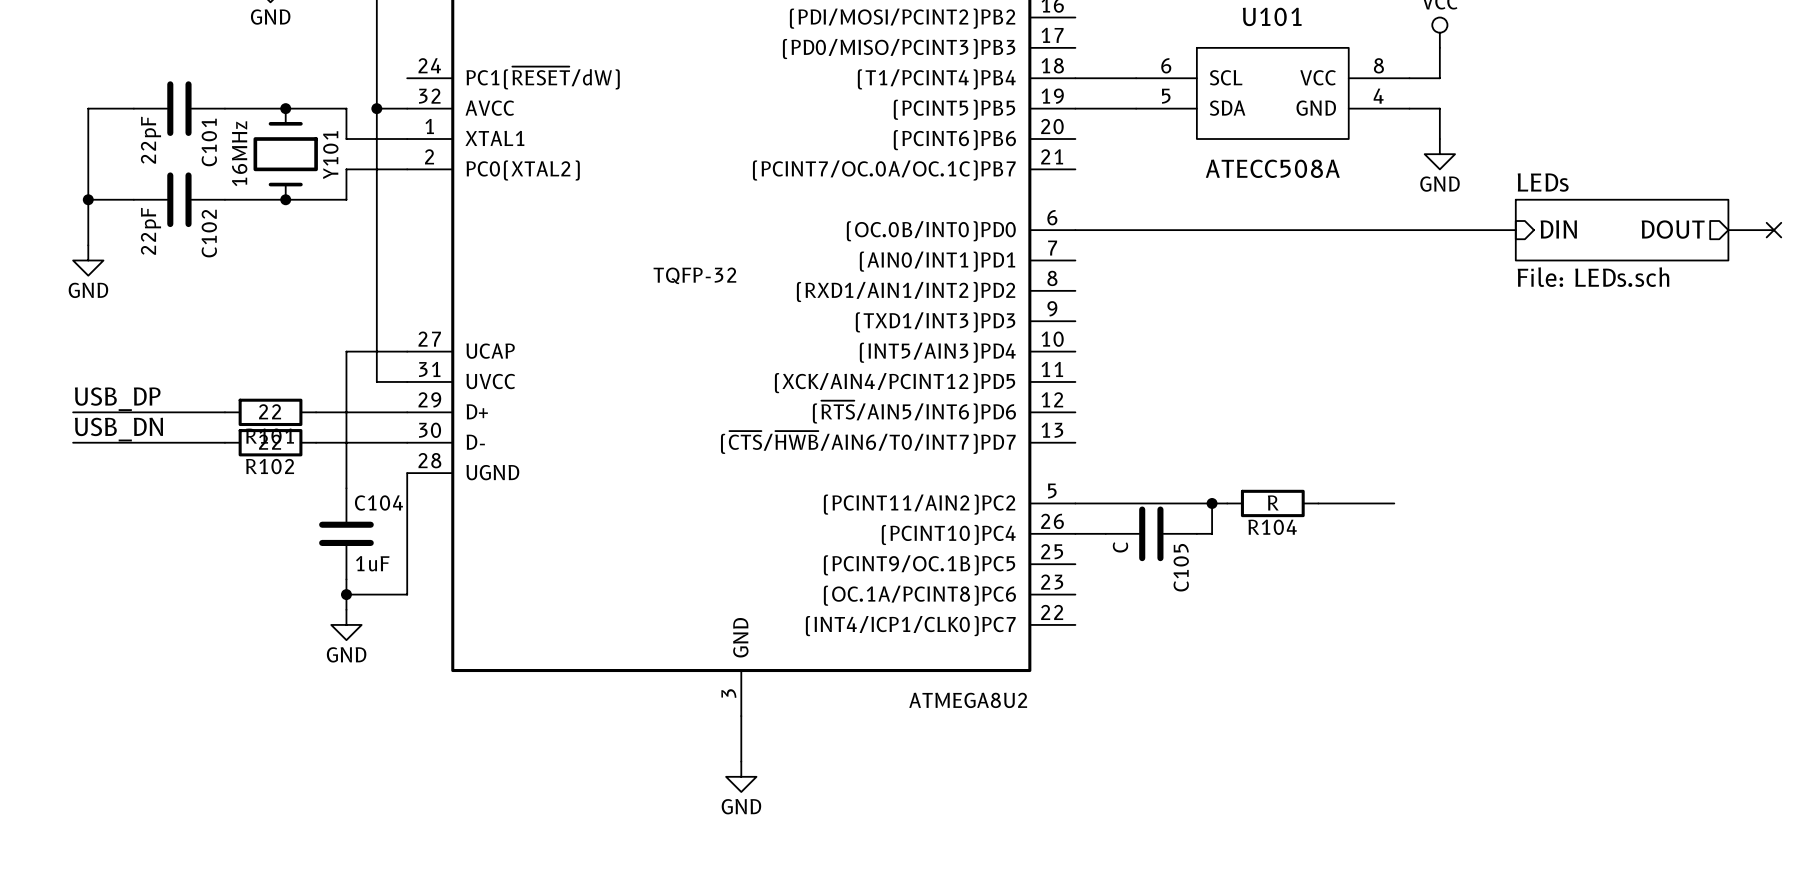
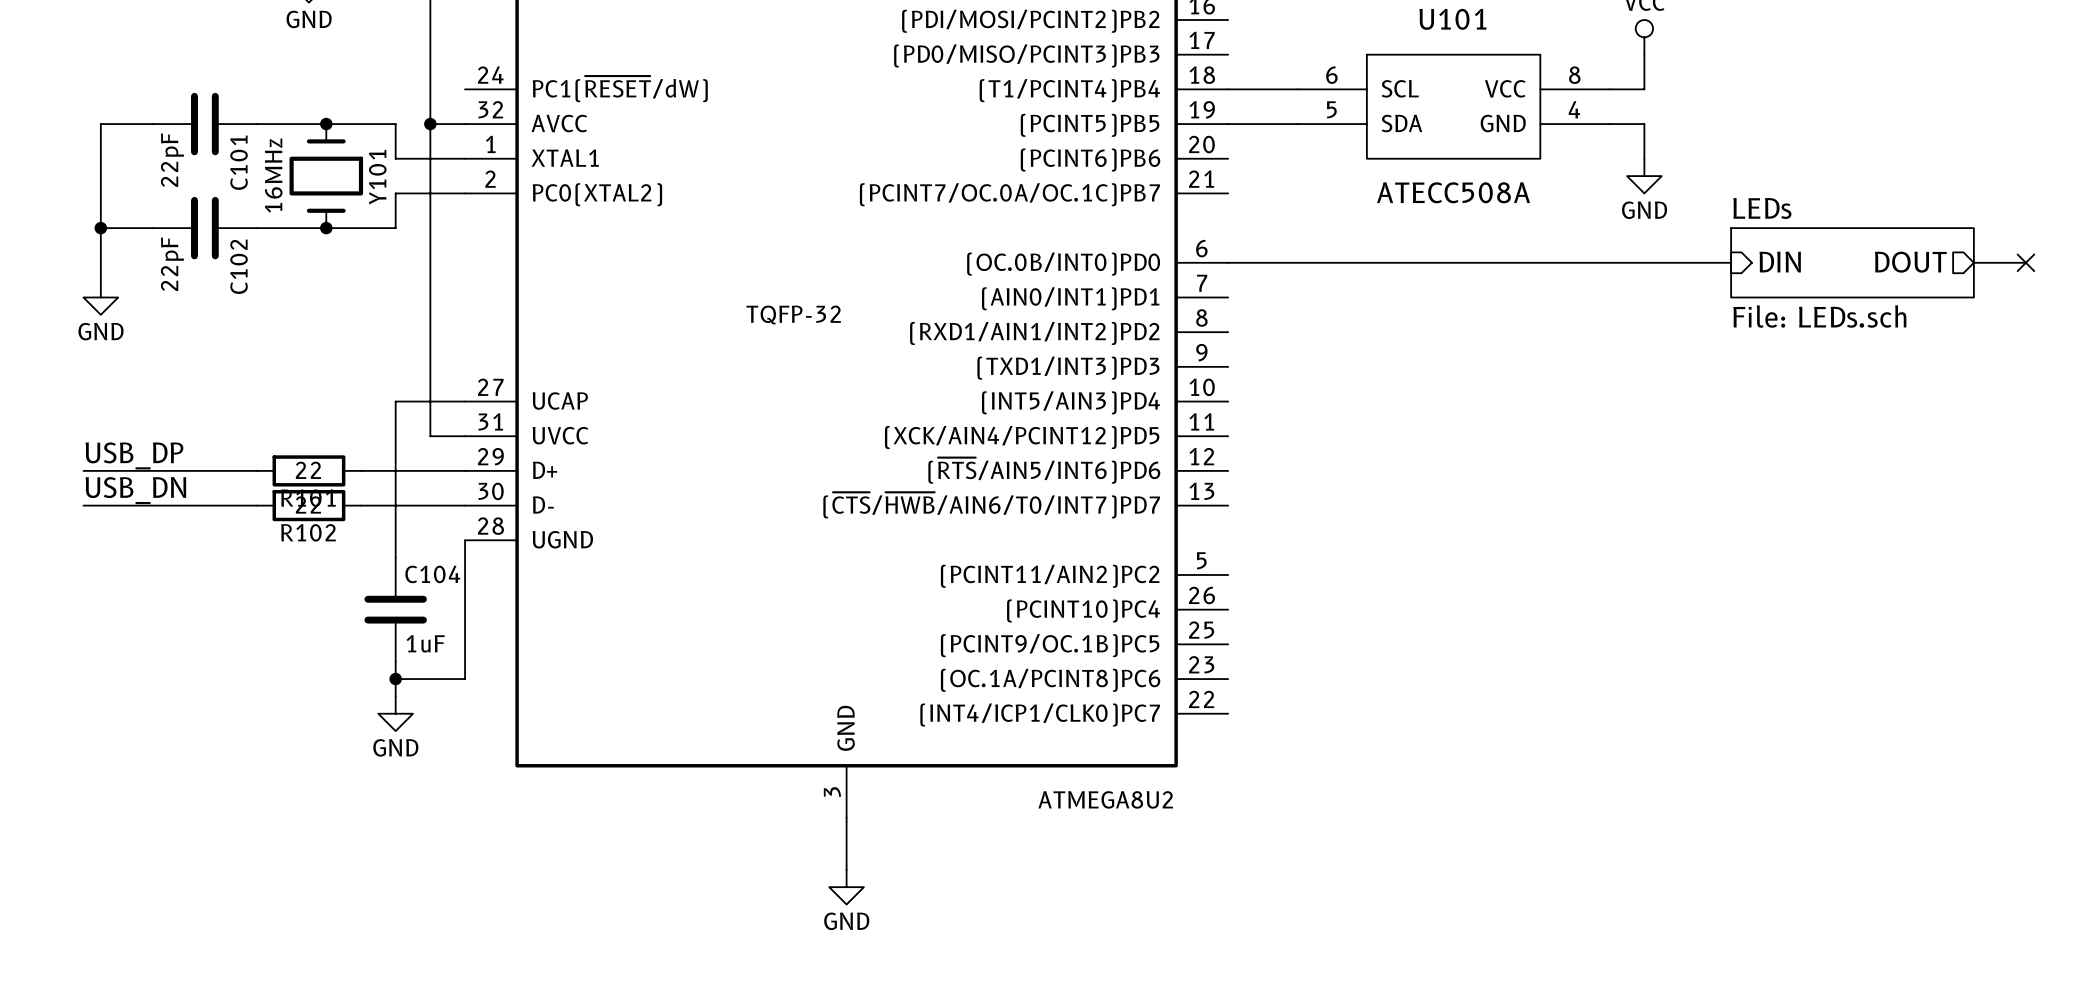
wire: (1075, 503) (1227, 503) -> none
wire: (1212, 503) (1212, 533) (1196, 533) -> none
junction: (1212, 503) -> none
R104: R (1272, 503) -> none
wire: (1318, 503) (1394, 503) -> none
wire: (1075, 533) (1105, 533) -> none
C105: C (1151, 533) -> none

